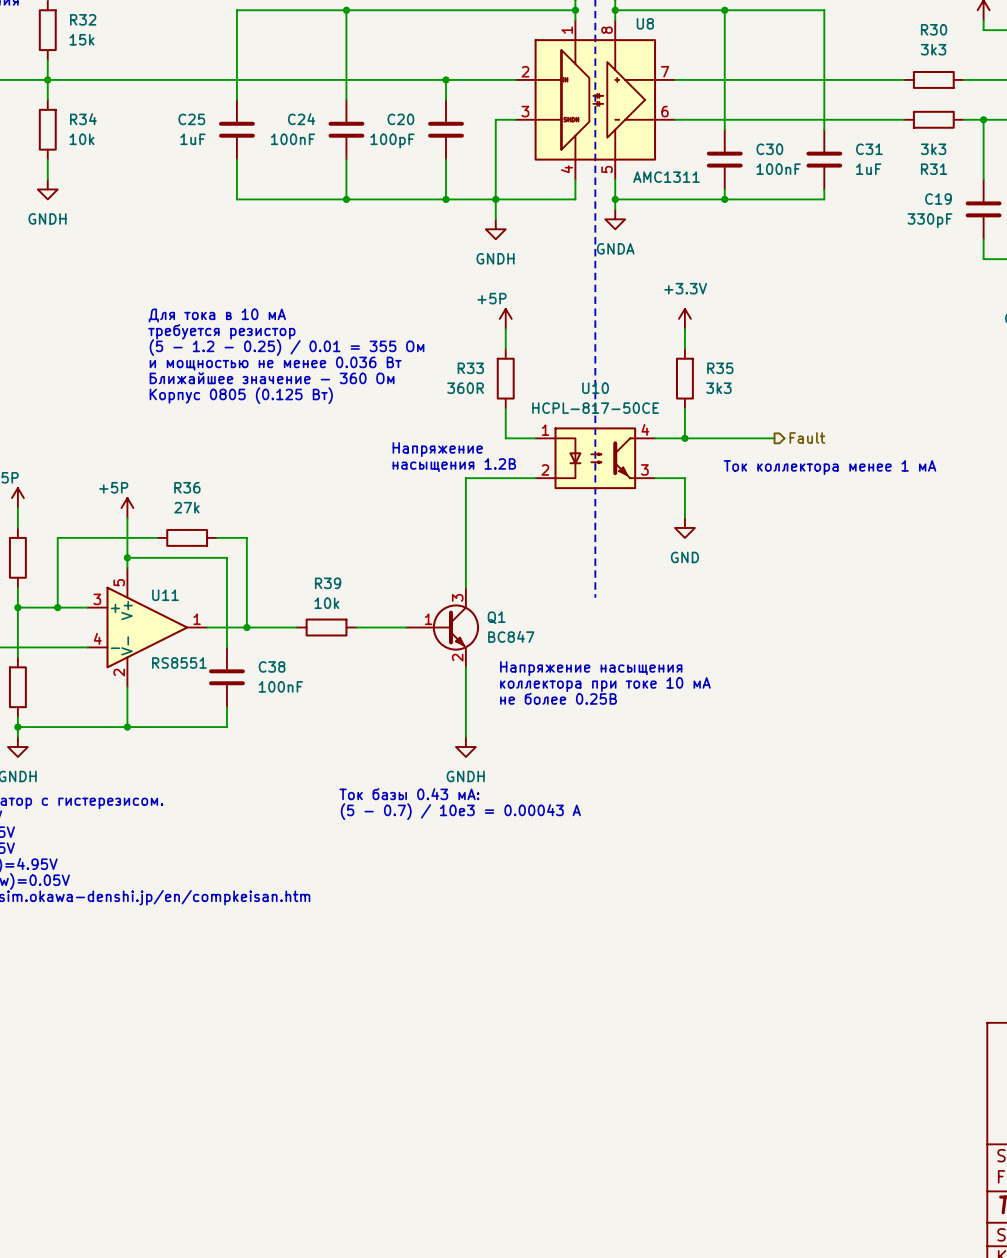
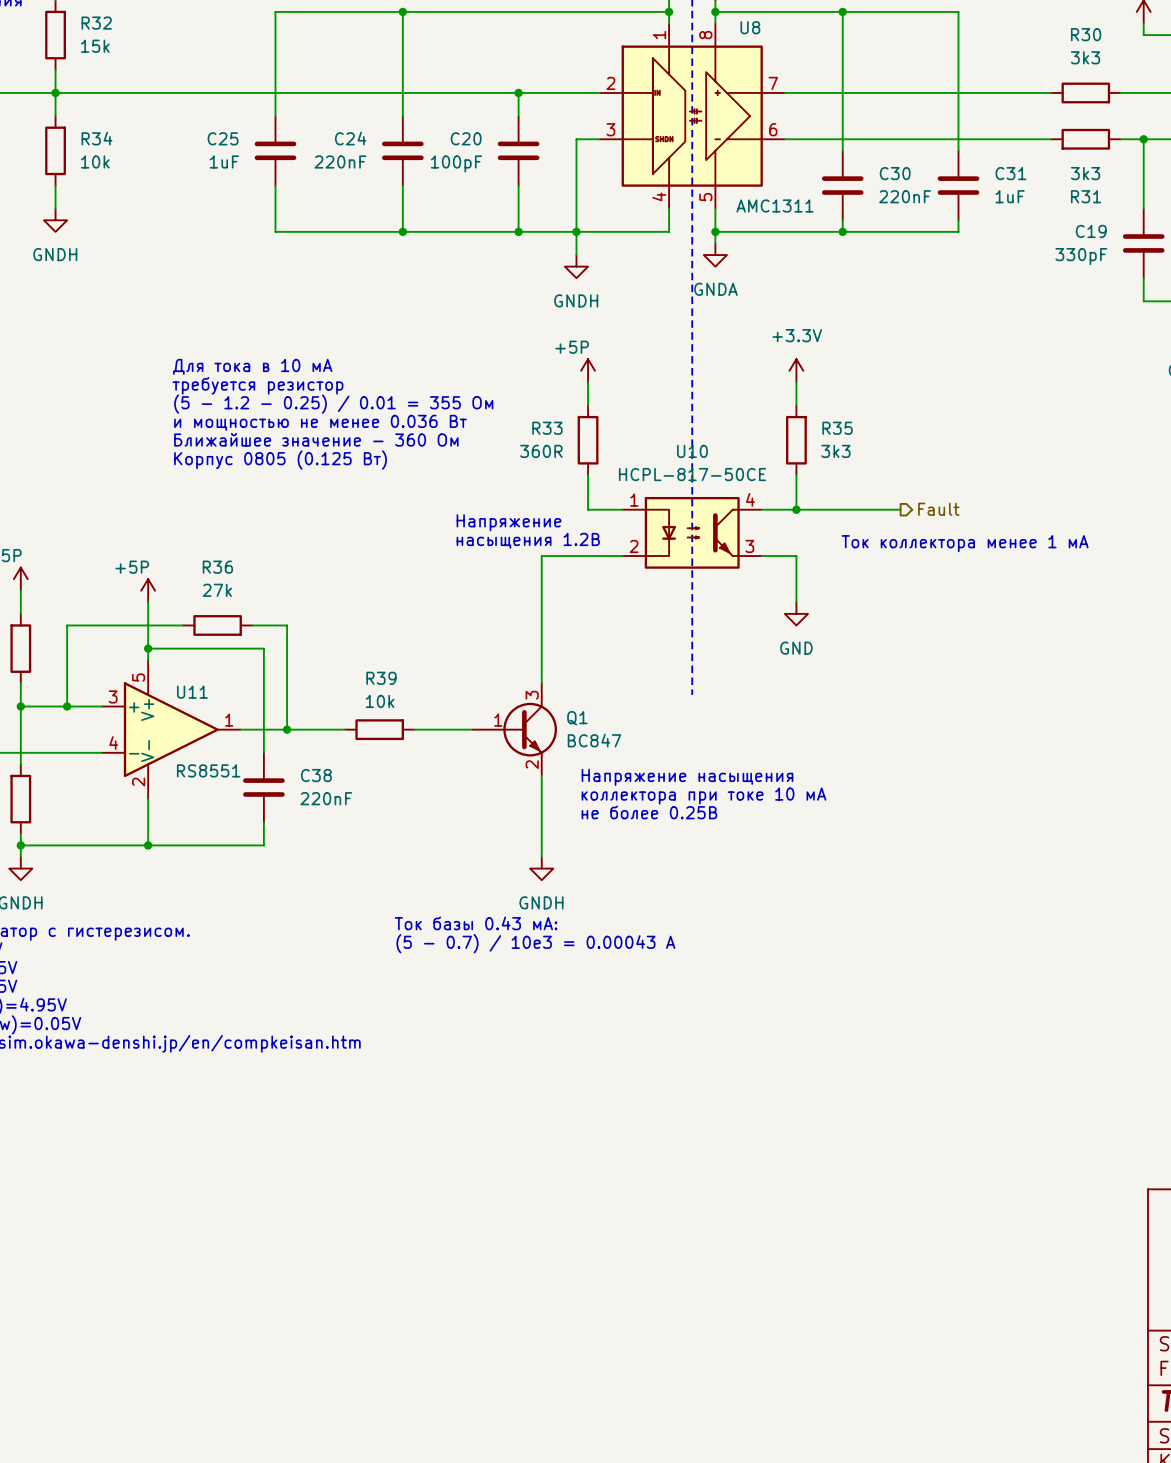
C24 value: 100nF (293, 139) -> 220nF (340, 161)
C30 value: 100nF (778, 169) -> 220nF (905, 196)
C38 value: 100nF (280, 686) -> 220nF (326, 798)

